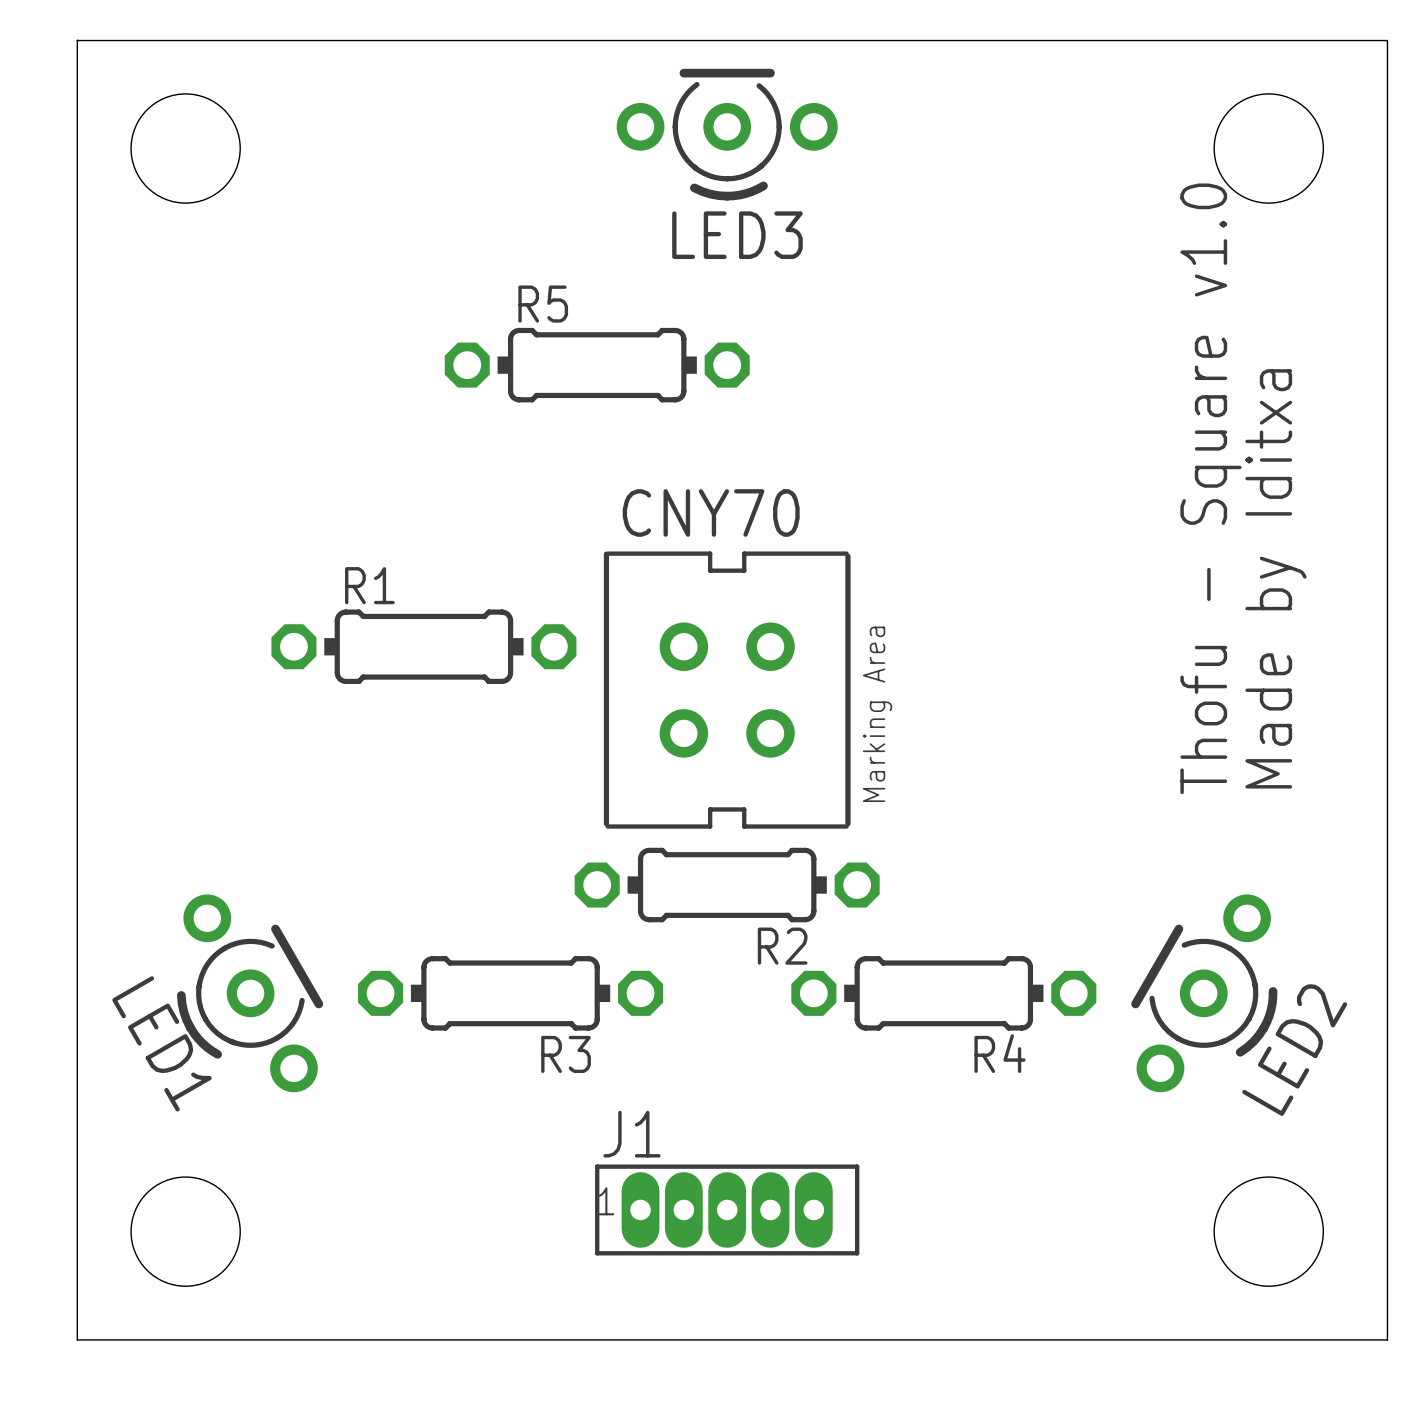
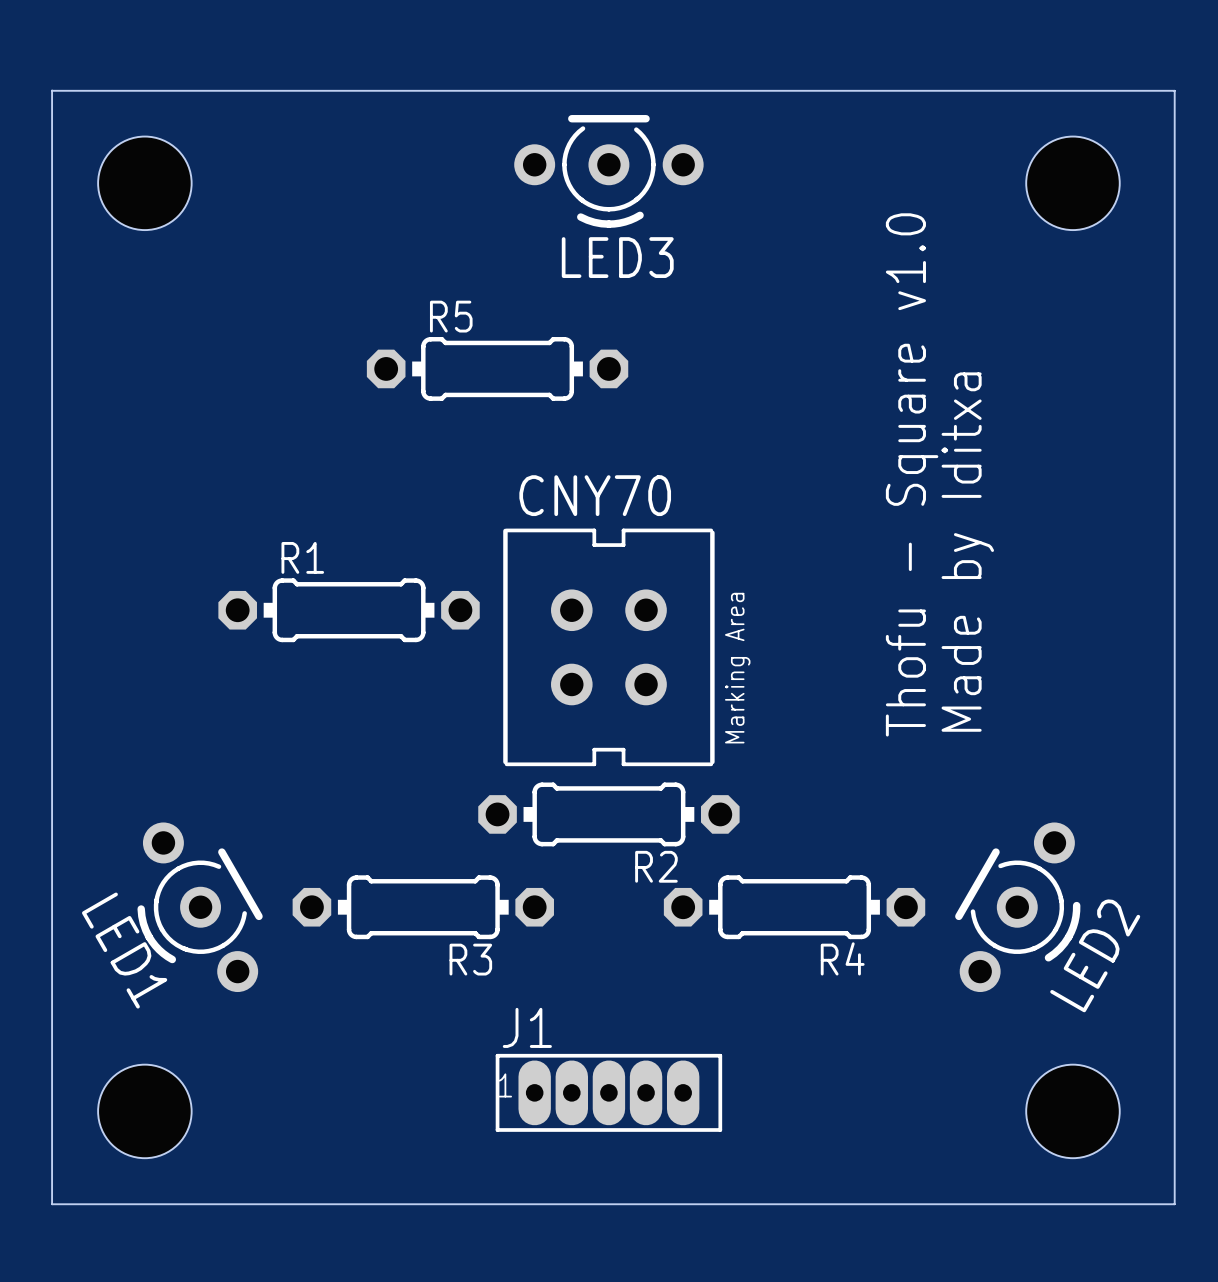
text position: Thofu - Square v1.0 (1210, 488) -> Thofu - Square v1.0 (912, 474)
text position: Made by Iditxa (1275, 578) -> Made by Iditxa (967, 552)

